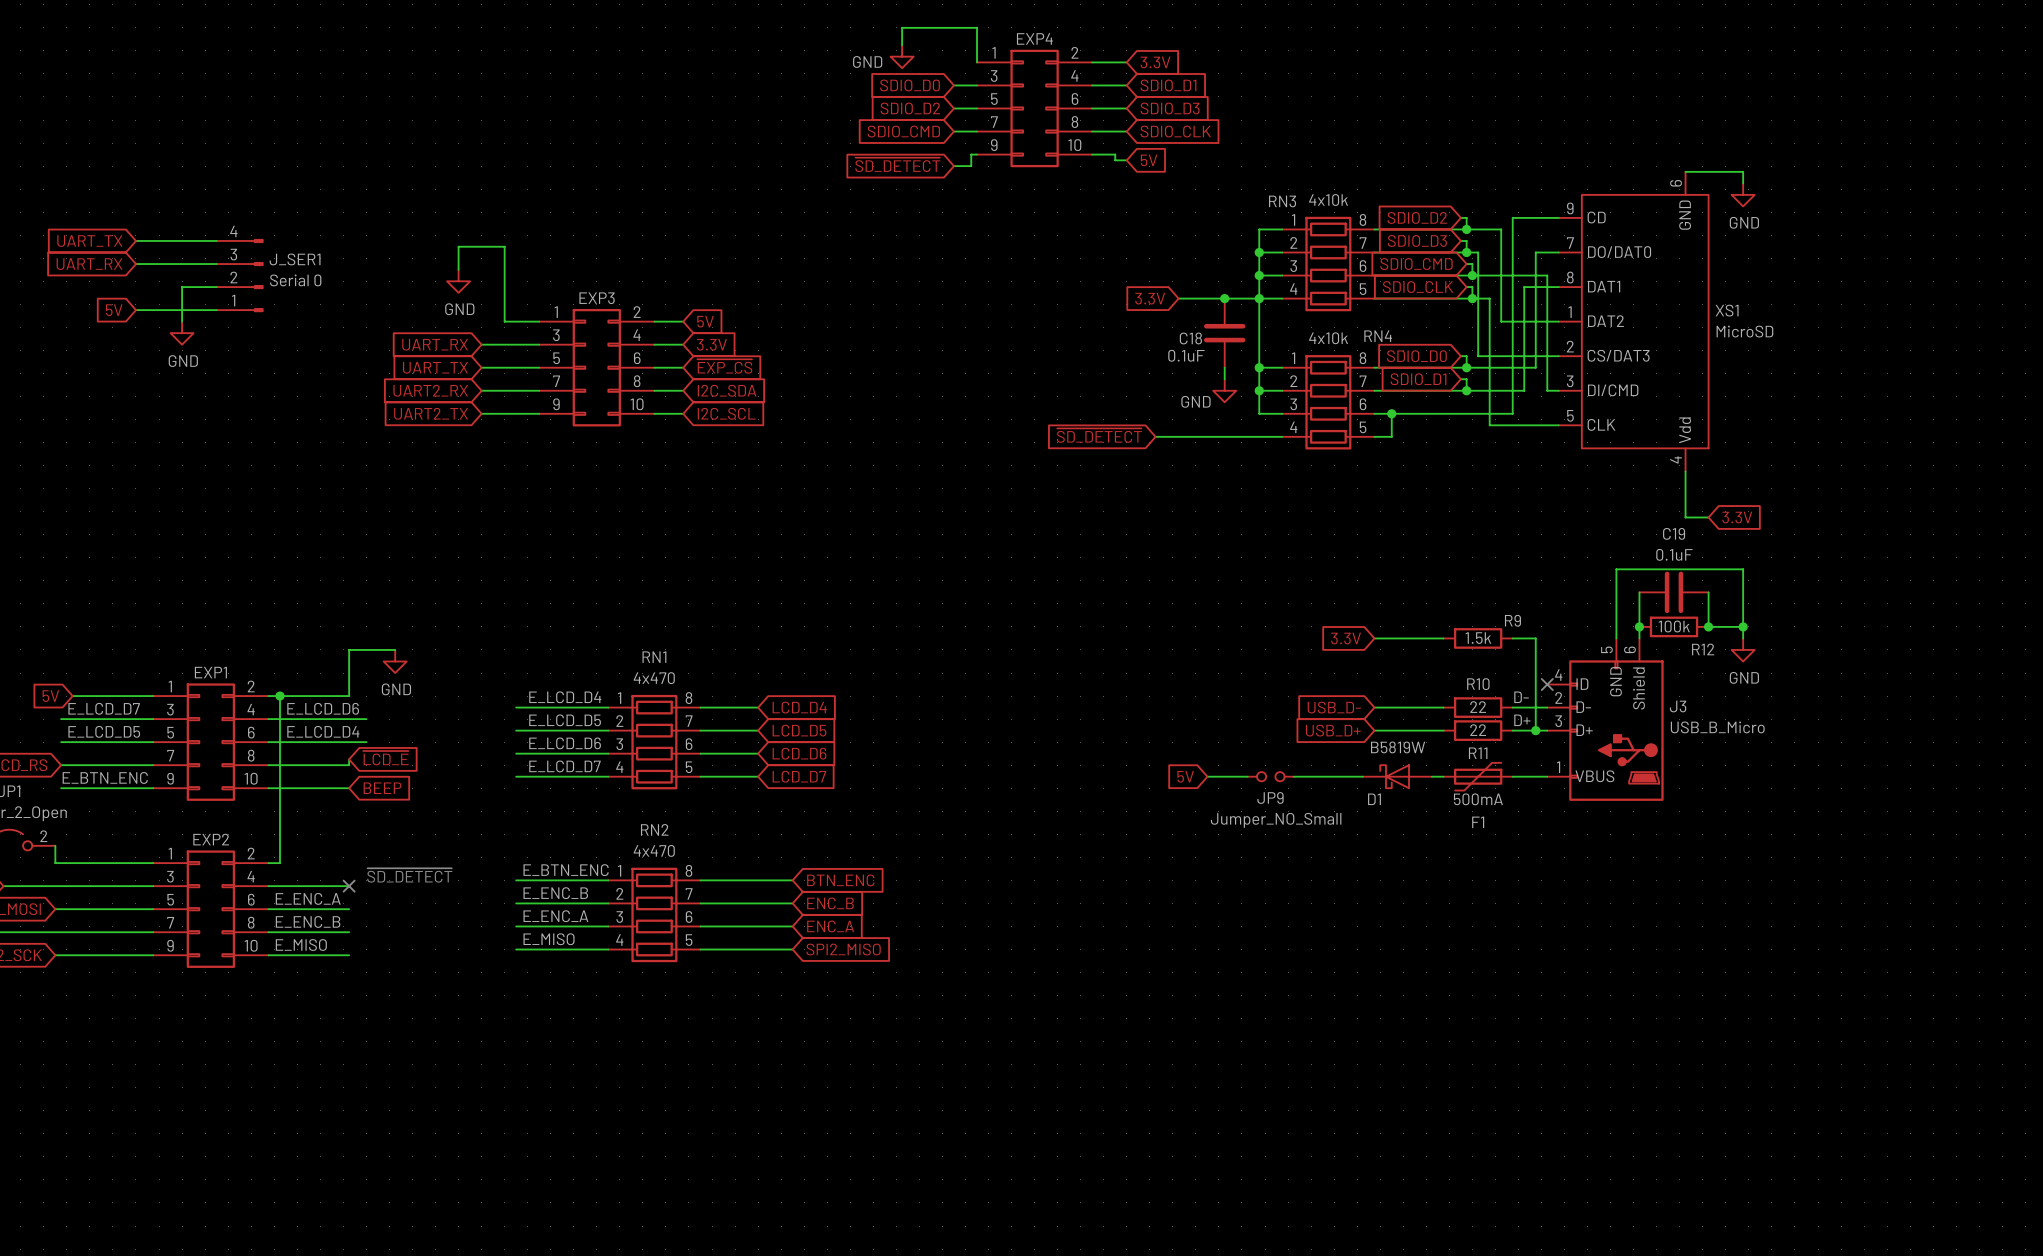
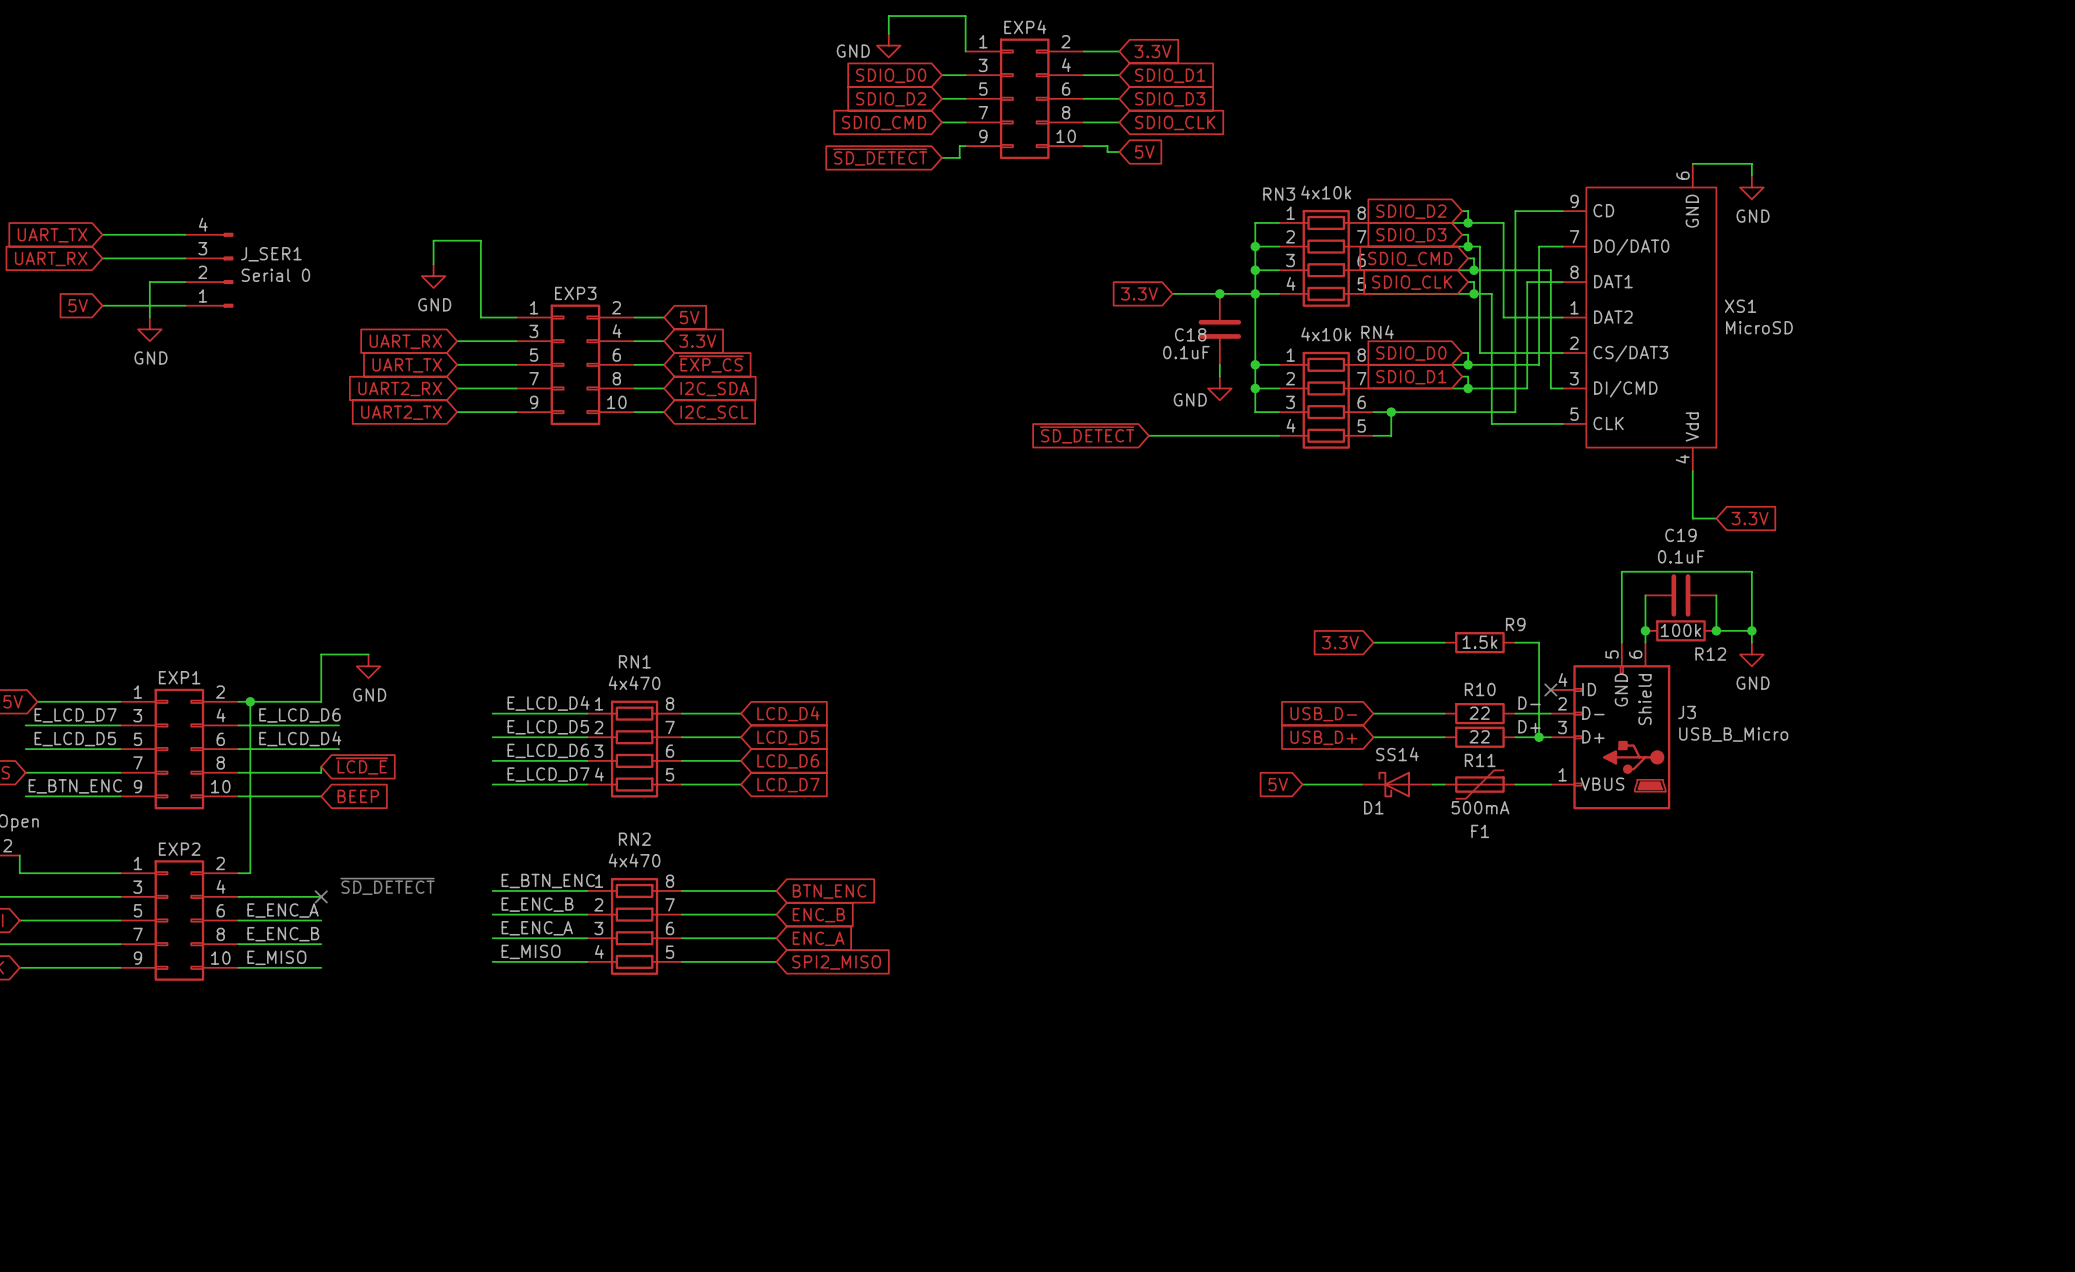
D1 value: B5819W (1398, 747) -> SS14 (1397, 754)
global label position: 5V (1185, 776) -> 5V (1278, 784)
wire: (1207, 776) (1247, 776) -> none
JP9: Jumper_NO_Small (1270, 776) -> none
wire: (1293, 776) (1305, 776) -> none

